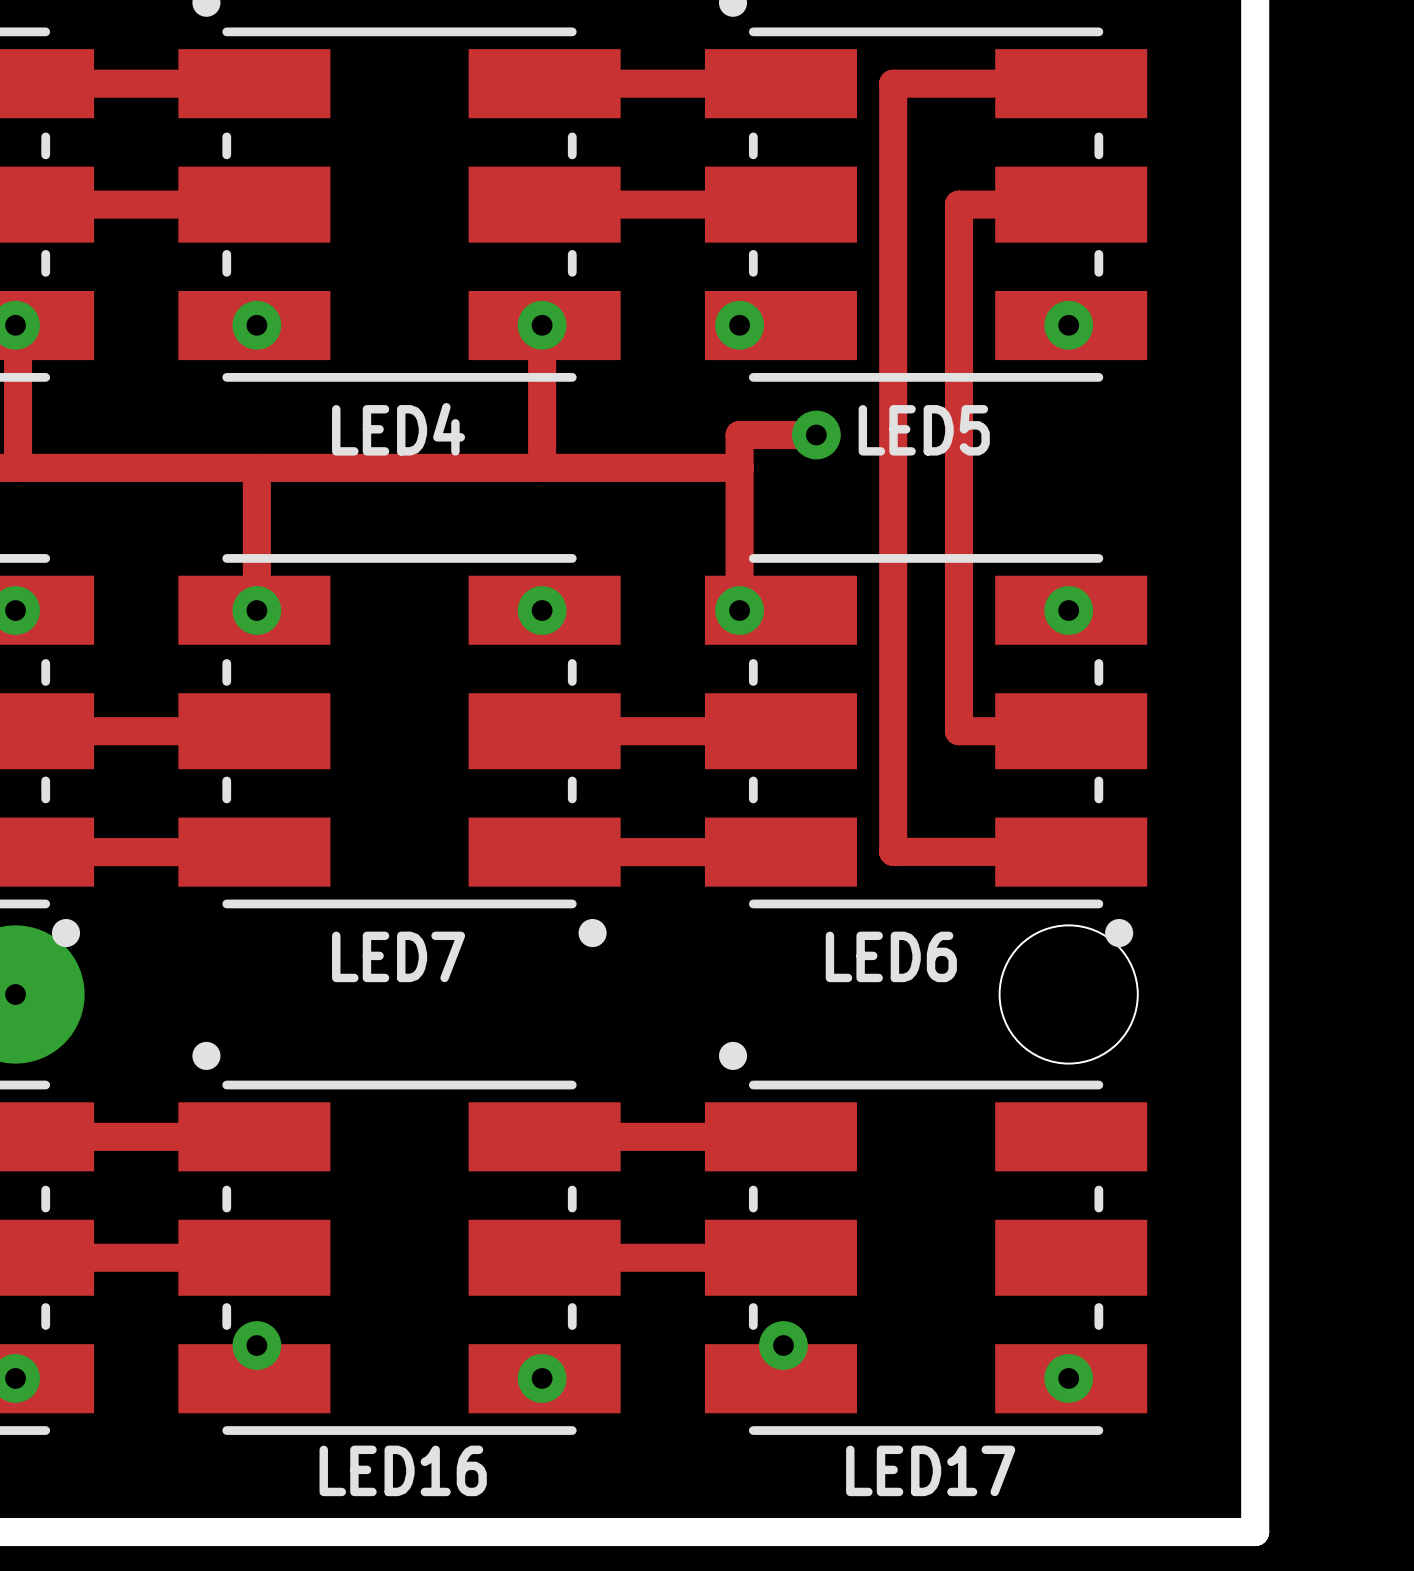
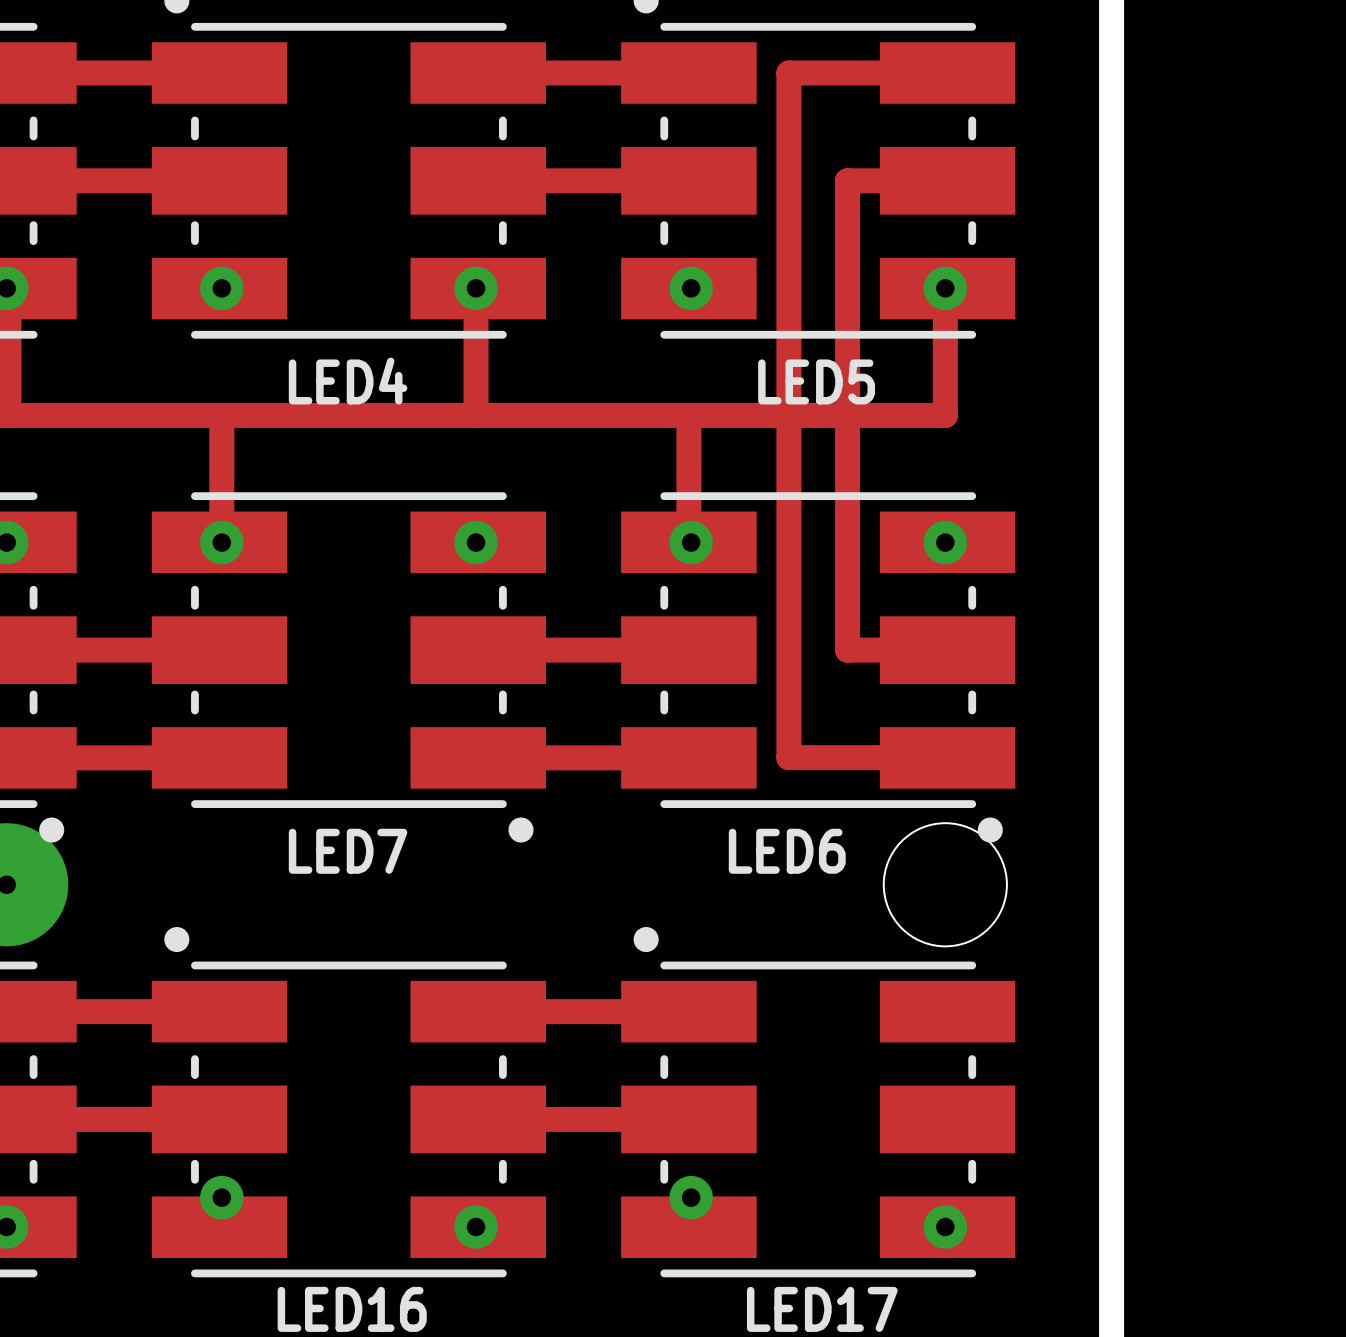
via position: (739, 325) -> (691, 288)
track: none -> (945, 288) (945, 415) (652, 415)
track: (816, 435) (739, 435) (739, 610) (780, 610) -> (688, 415) (688, 542) (690, 542)
via: (816, 435) -> none
via position: (739, 610) -> (691, 542)

